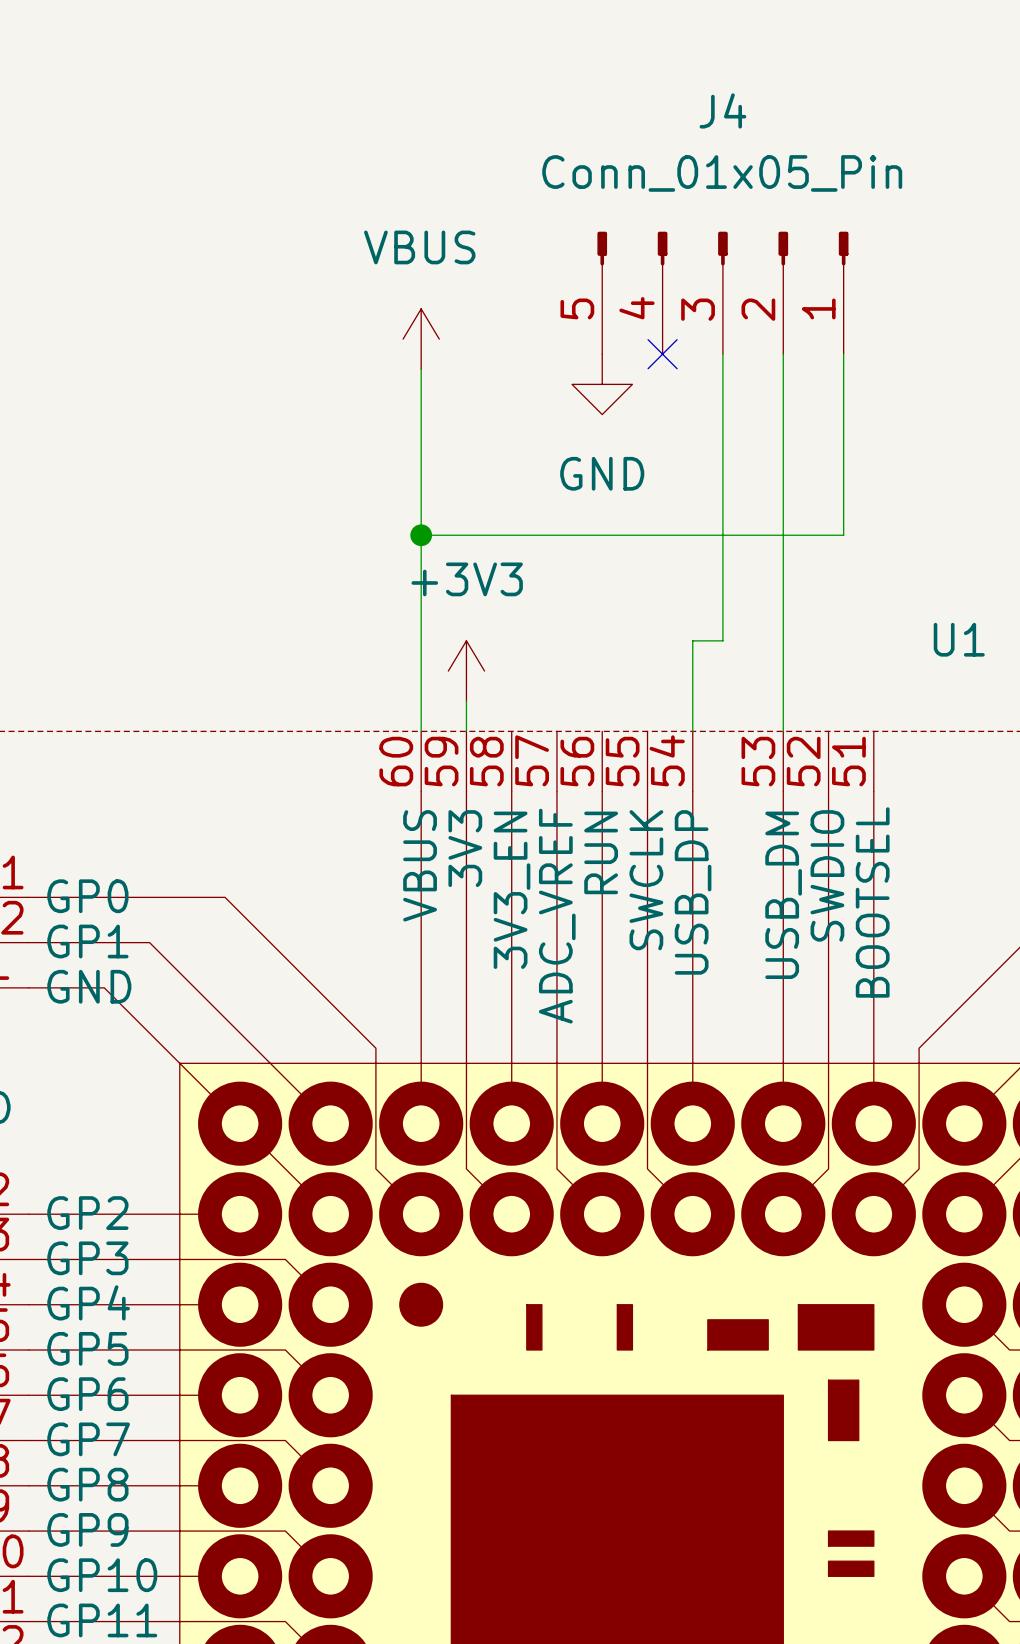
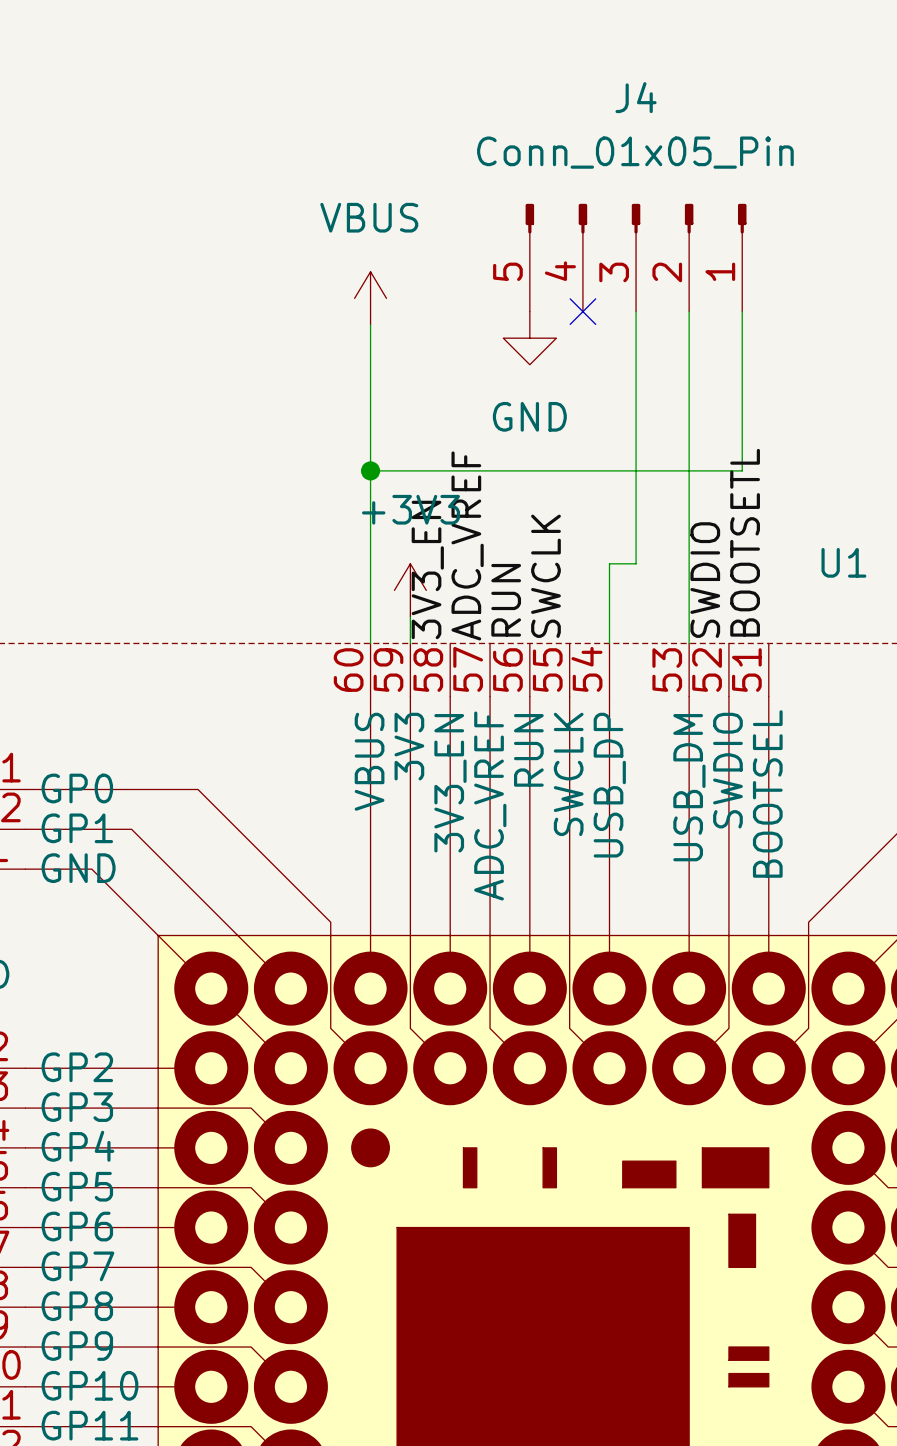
label: none -> BOOTSETL (745, 542)
label: none -> ADC_VREF (467, 545)
label: none -> 3V3_EN (427, 569)
label: none -> SWCLK (545, 576)
label: none -> SWDIO (705, 580)
label: none -> RUN (506, 600)

